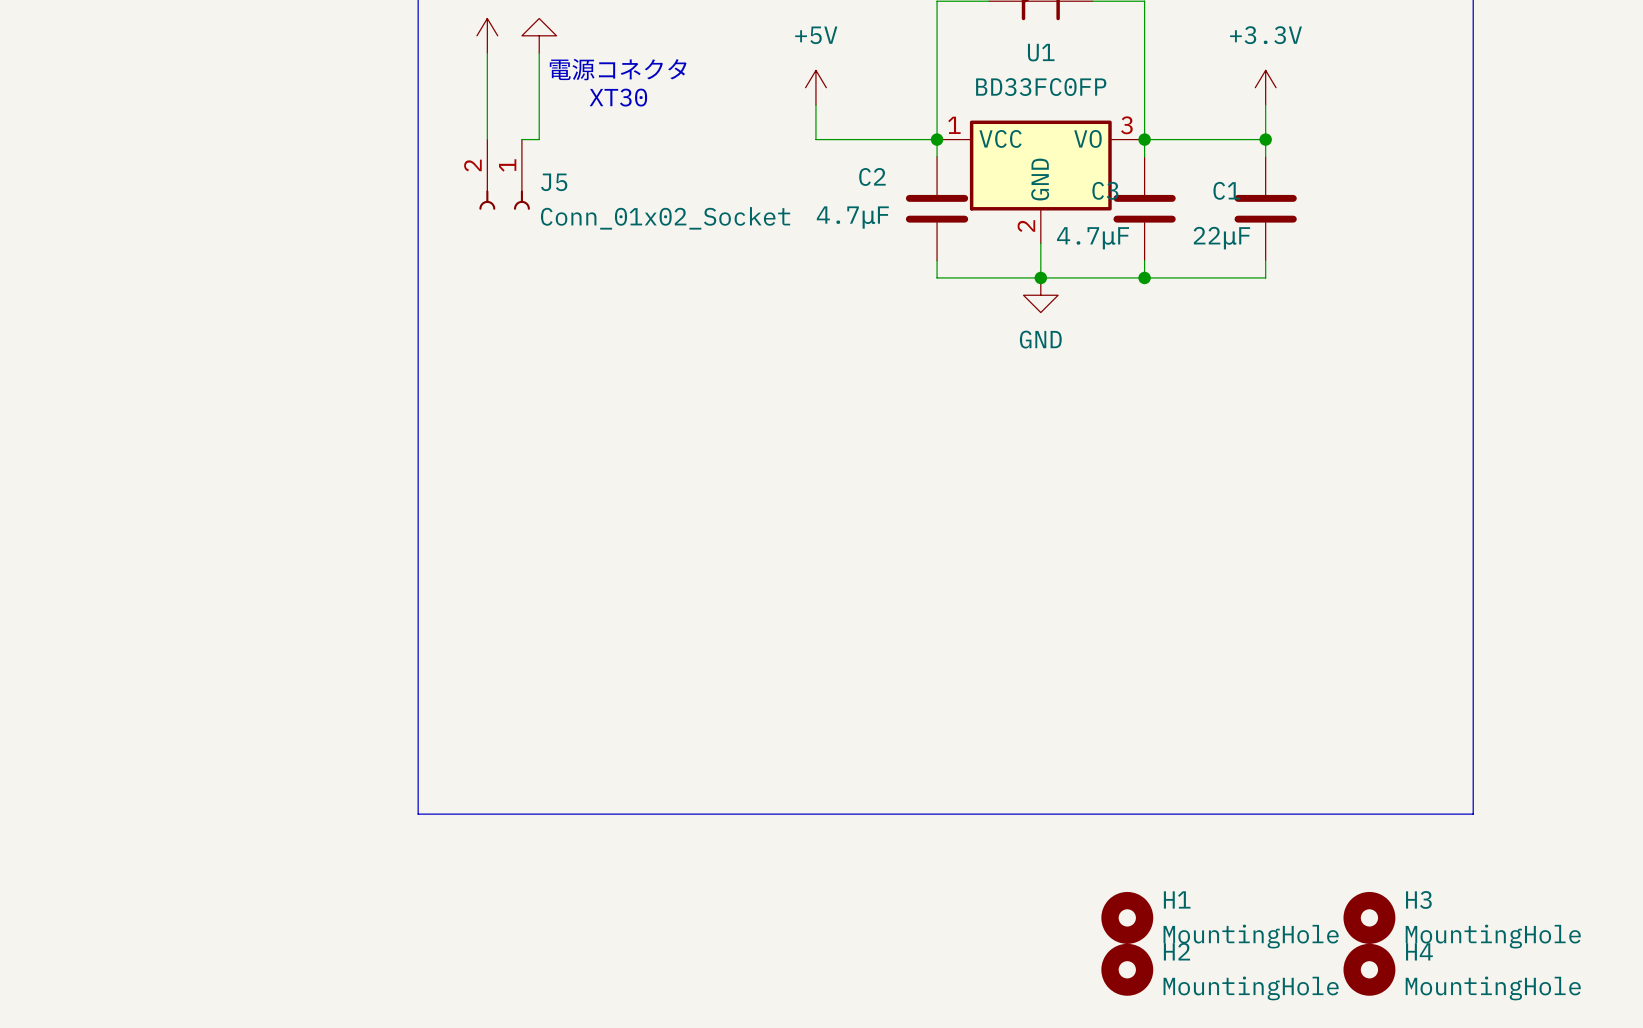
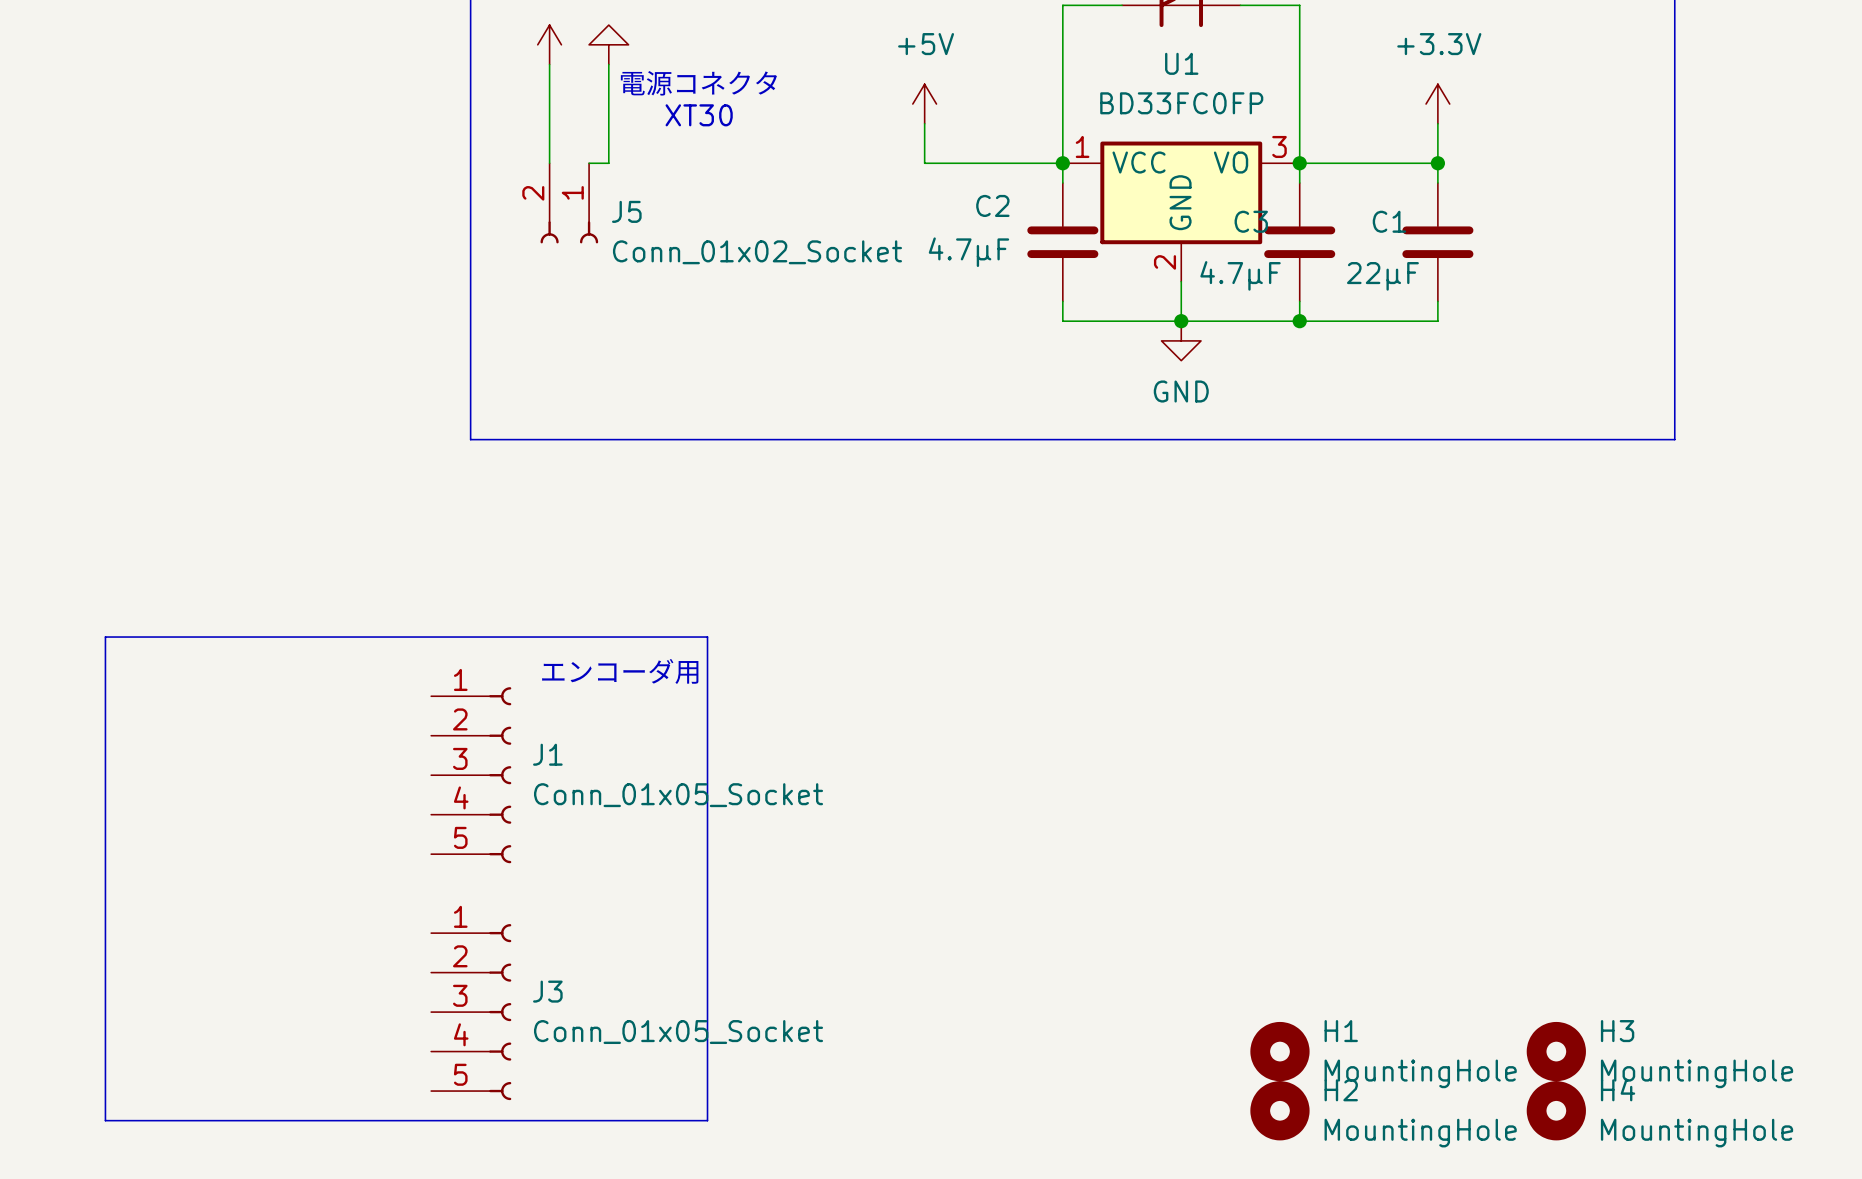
line: (418, 381) (418, 814) (1473, 814) (1473, 381) -> (470, 439) (1674, 439)
line: none -> (105, 637) (707, 637) (707, 1120) (105, 1120) (105, 637)
text: none -> エンコーダ用 (620, 671)
J1: none -> Conn_01x05_Socket (471, 775)
J3: none -> Conn_01x05_Socket (471, 1012)

